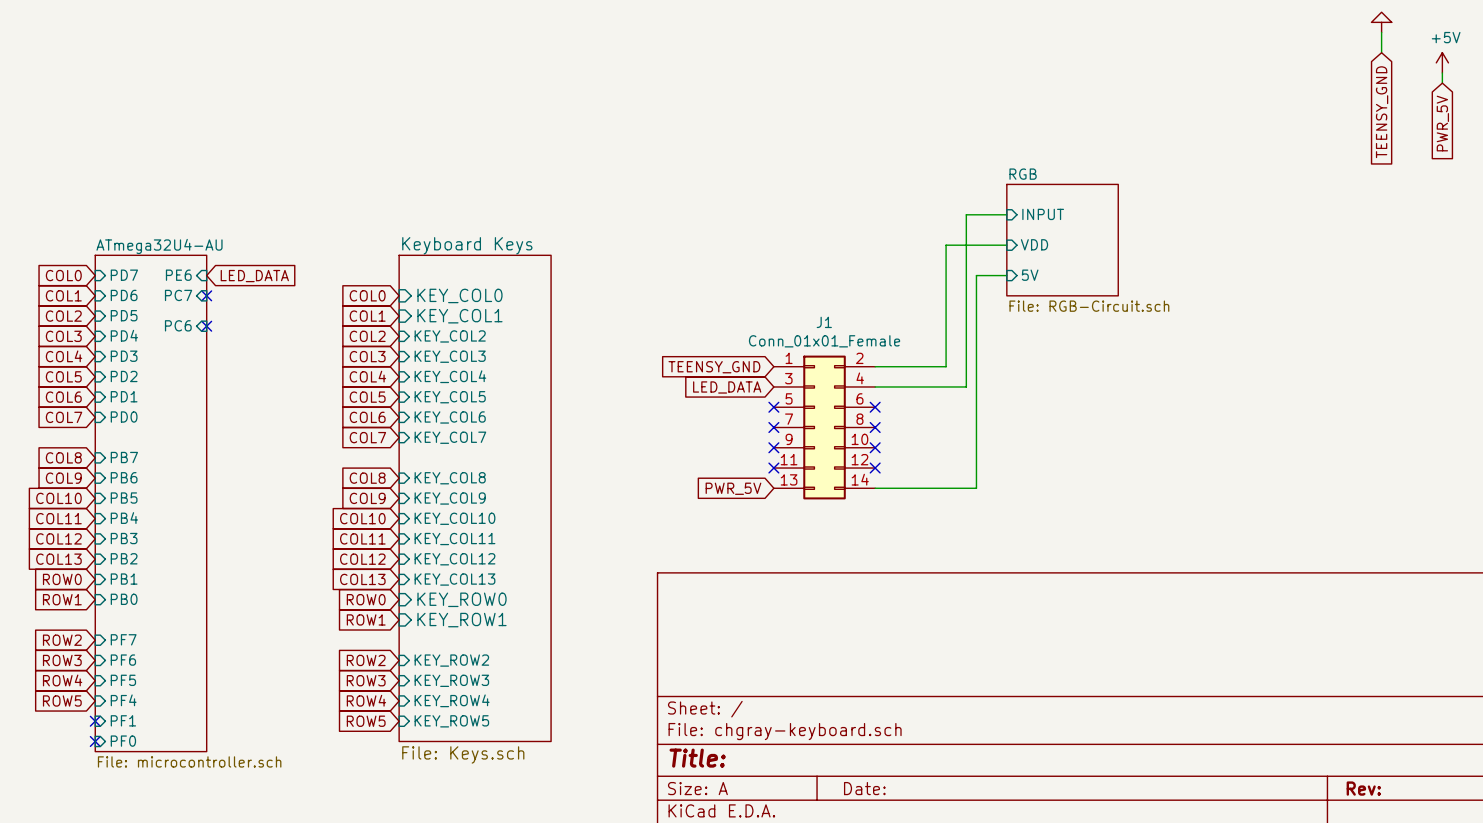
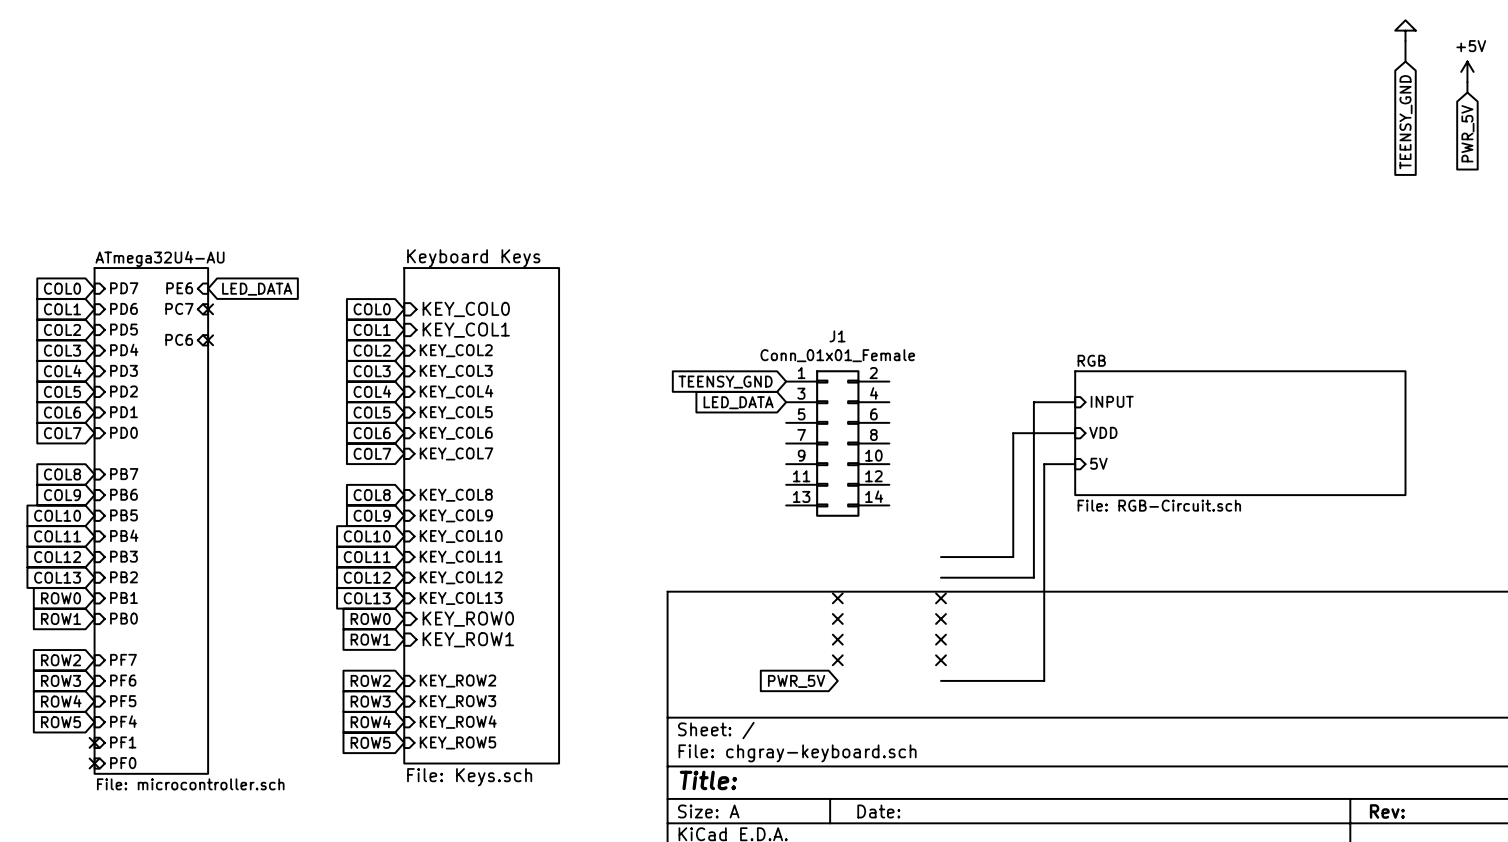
wire: (1006, 214) (966, 214) (966, 386) (875, 386) -> (1075, 402) (1033, 402) (1033, 577) (941, 577)
sheet pin position: INPUT (1043, 214) -> INPUT (1112, 401)
sheet RGB: File: RGB-Circuit.sch (1062, 240) -> none
sheet pin position: VDD (1034, 244) -> VDD (1103, 432)
wire: (1006, 245) (946, 245) (946, 366) (875, 366) -> (1075, 433) (1013, 433) (1013, 557) (941, 557)
wire: (1006, 275) (976, 275) (976, 488) (875, 488) -> (1075, 464) (1044, 464) (1044, 680) (941, 680)
sheet pin position: 5V (1030, 275) -> 5V (1098, 463)
no-connect mark: (773, 407) -> none
no-connect mark: (875, 407) -> none
sheet RGB: none -> File: RGB-Circuit.sch (1240, 433)
no-connect mark: (773, 427) -> none
no-connect mark: (875, 427) -> none
no-connect mark: (773, 447) -> none
no-connect mark: (875, 447) -> none
no-connect mark: (773, 468) -> none
no-connect mark: (875, 468) -> none
global label position: PWR_5V (733, 488) -> PWR_5V (796, 681)
no-connect mark: none -> (837, 598)
no-connect mark: none -> (941, 598)
no-connect mark: none -> (837, 618)
no-connect mark: none -> (941, 618)
no-connect mark: none -> (837, 639)
no-connect mark: none -> (941, 639)
no-connect mark: none -> (837, 660)
no-connect mark: none -> (941, 660)

